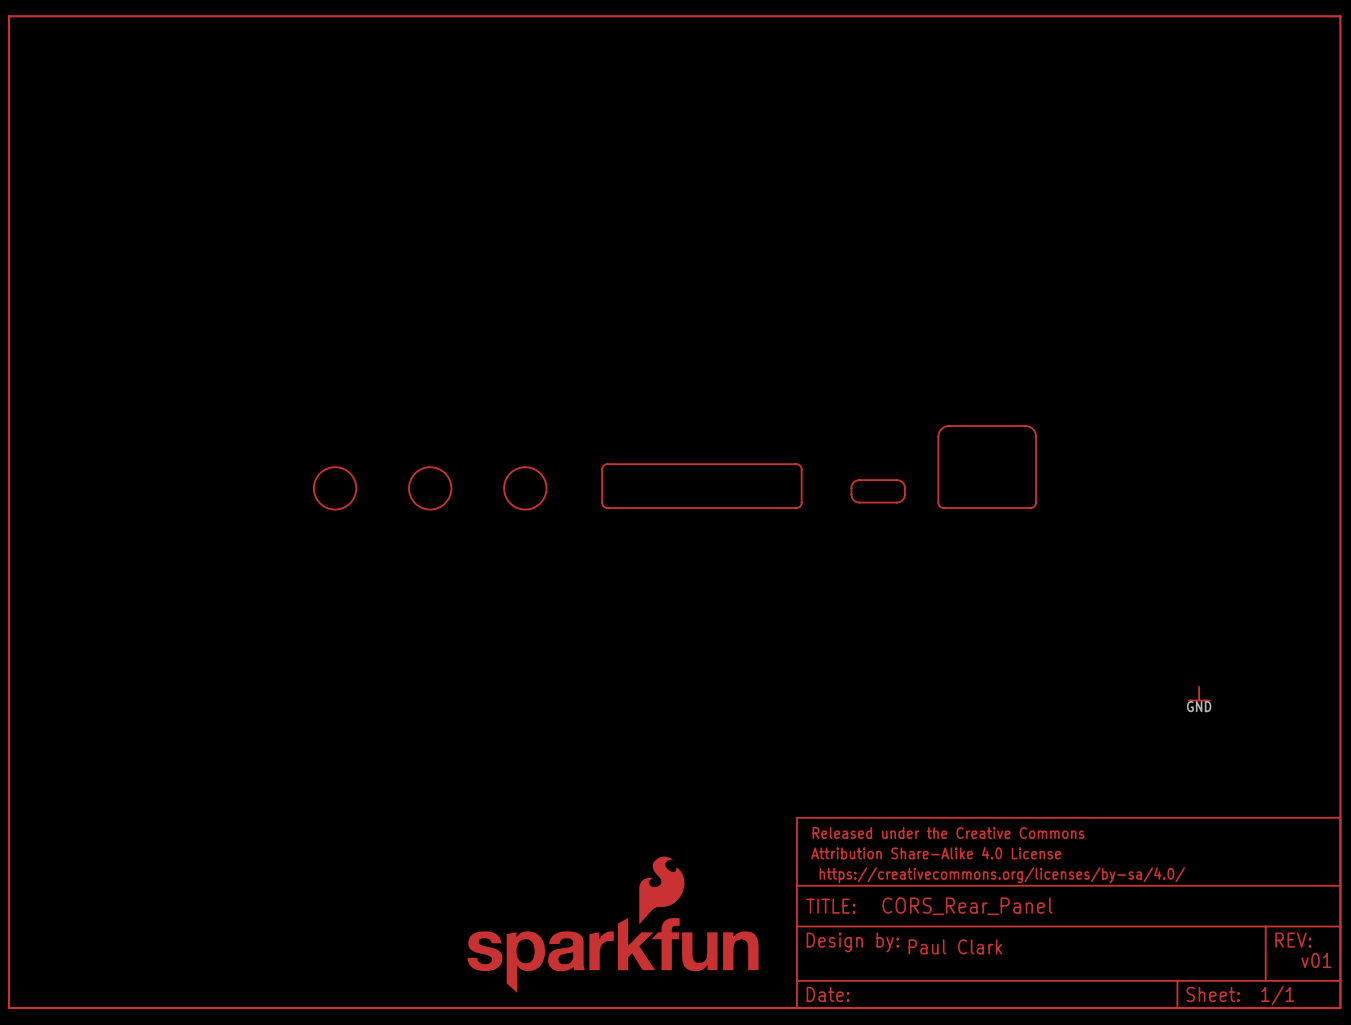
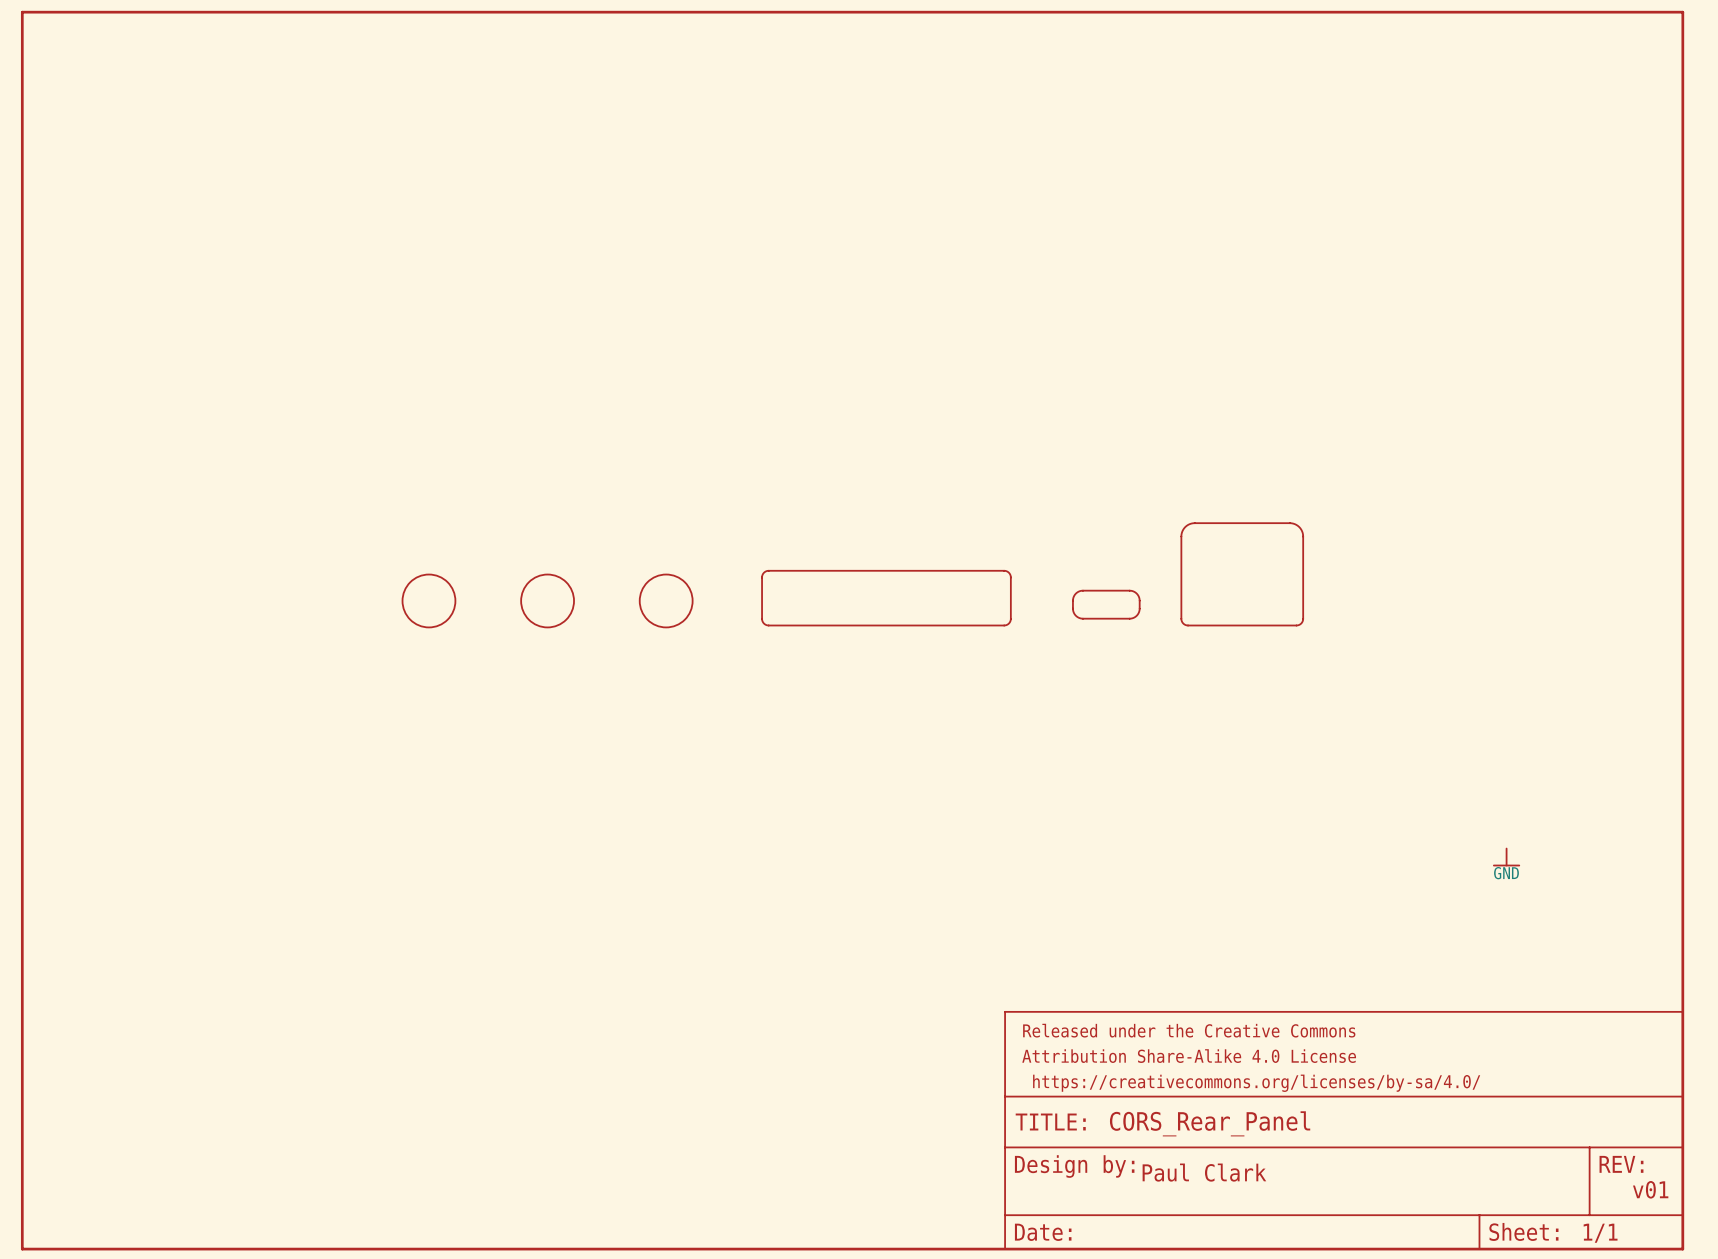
part: (612, 924) -> none

